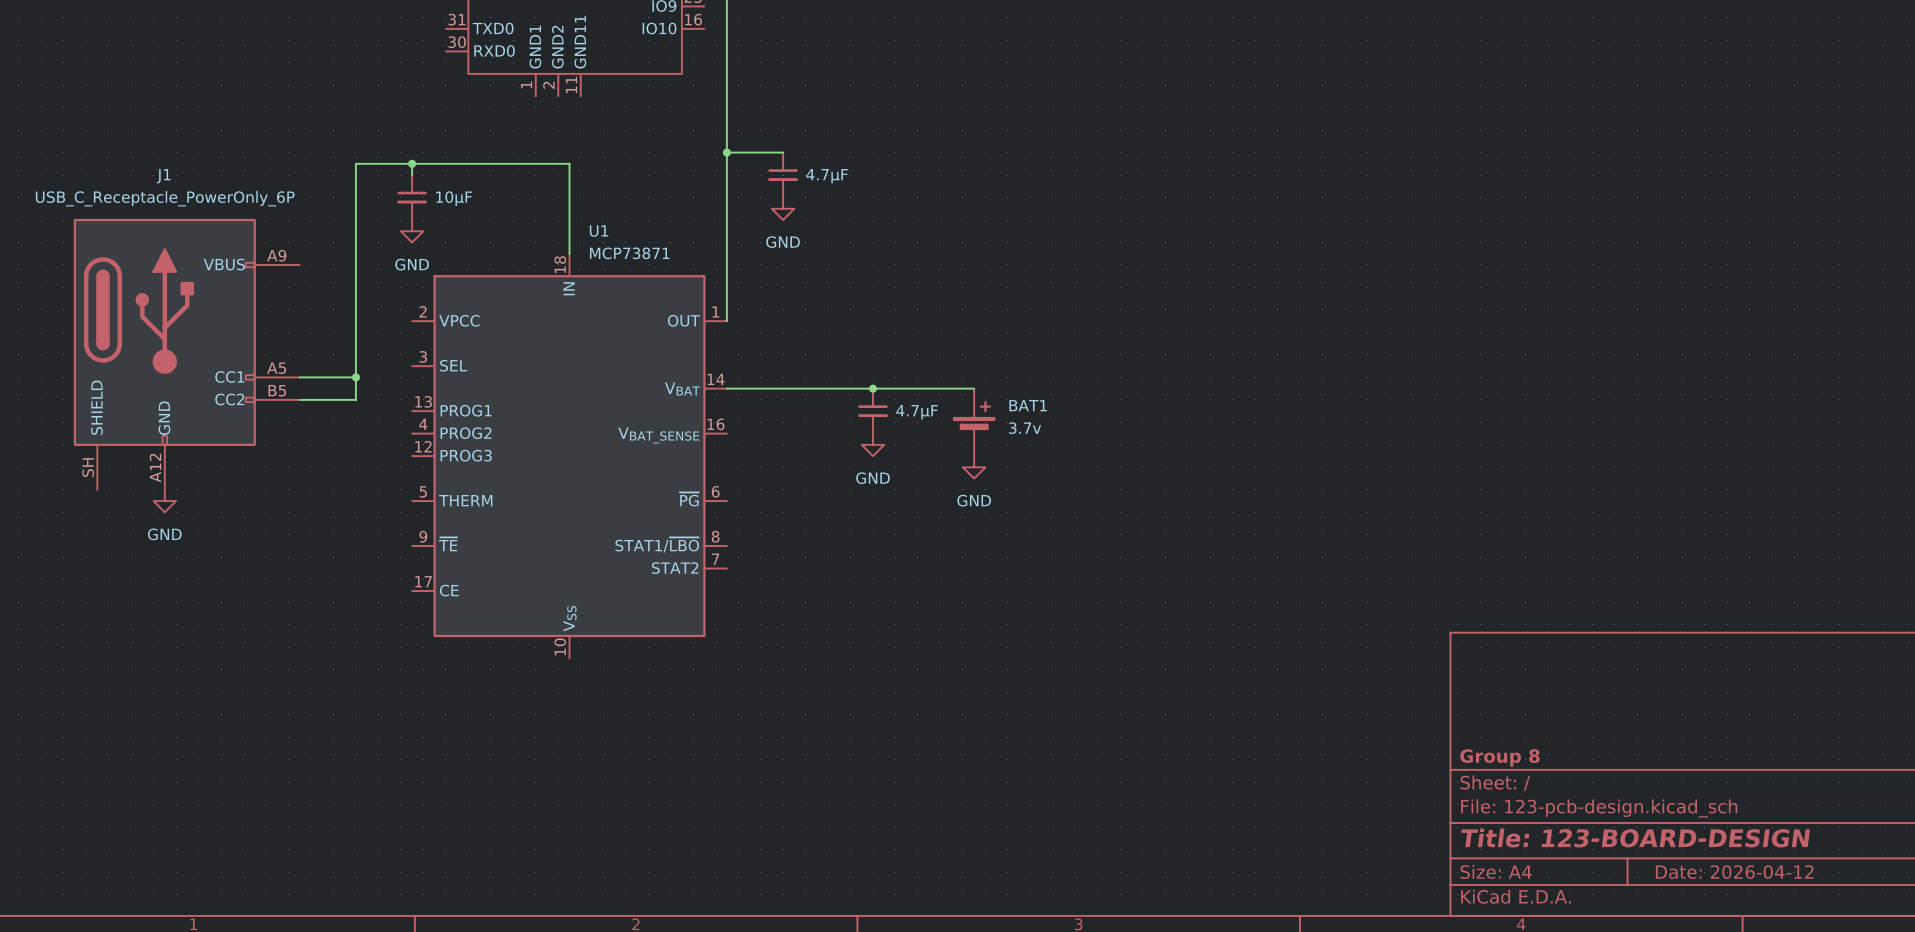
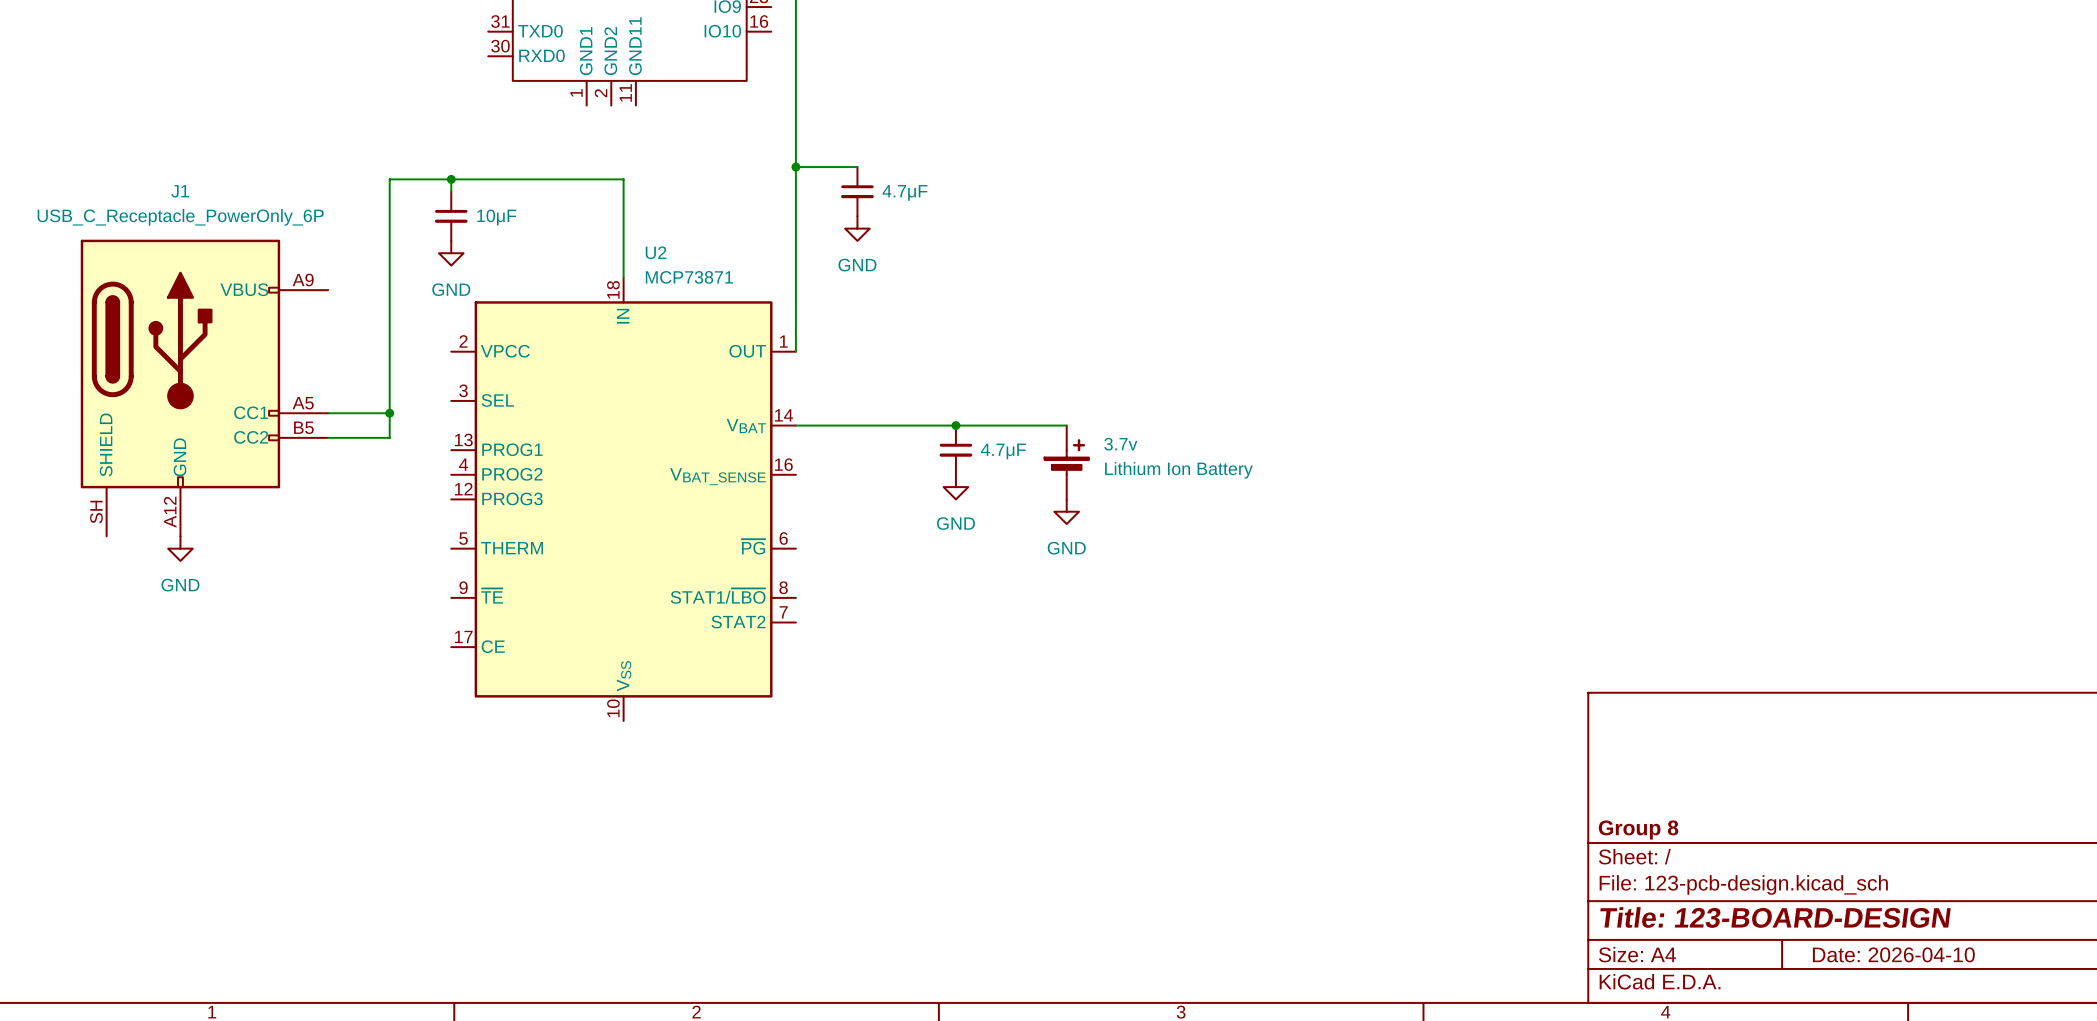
U1 name: U1 (598, 230) -> U2 (656, 252)
BAT1 name: BAT1 (1028, 405) -> 3.7v (1120, 444)
BAT1 value: 3.7v (1025, 428) -> Lithium Ion Battery (1178, 470)
title block: Date: 2026-04-12 (1734, 872) -> Date: 2026-04-10 (1893, 954)

